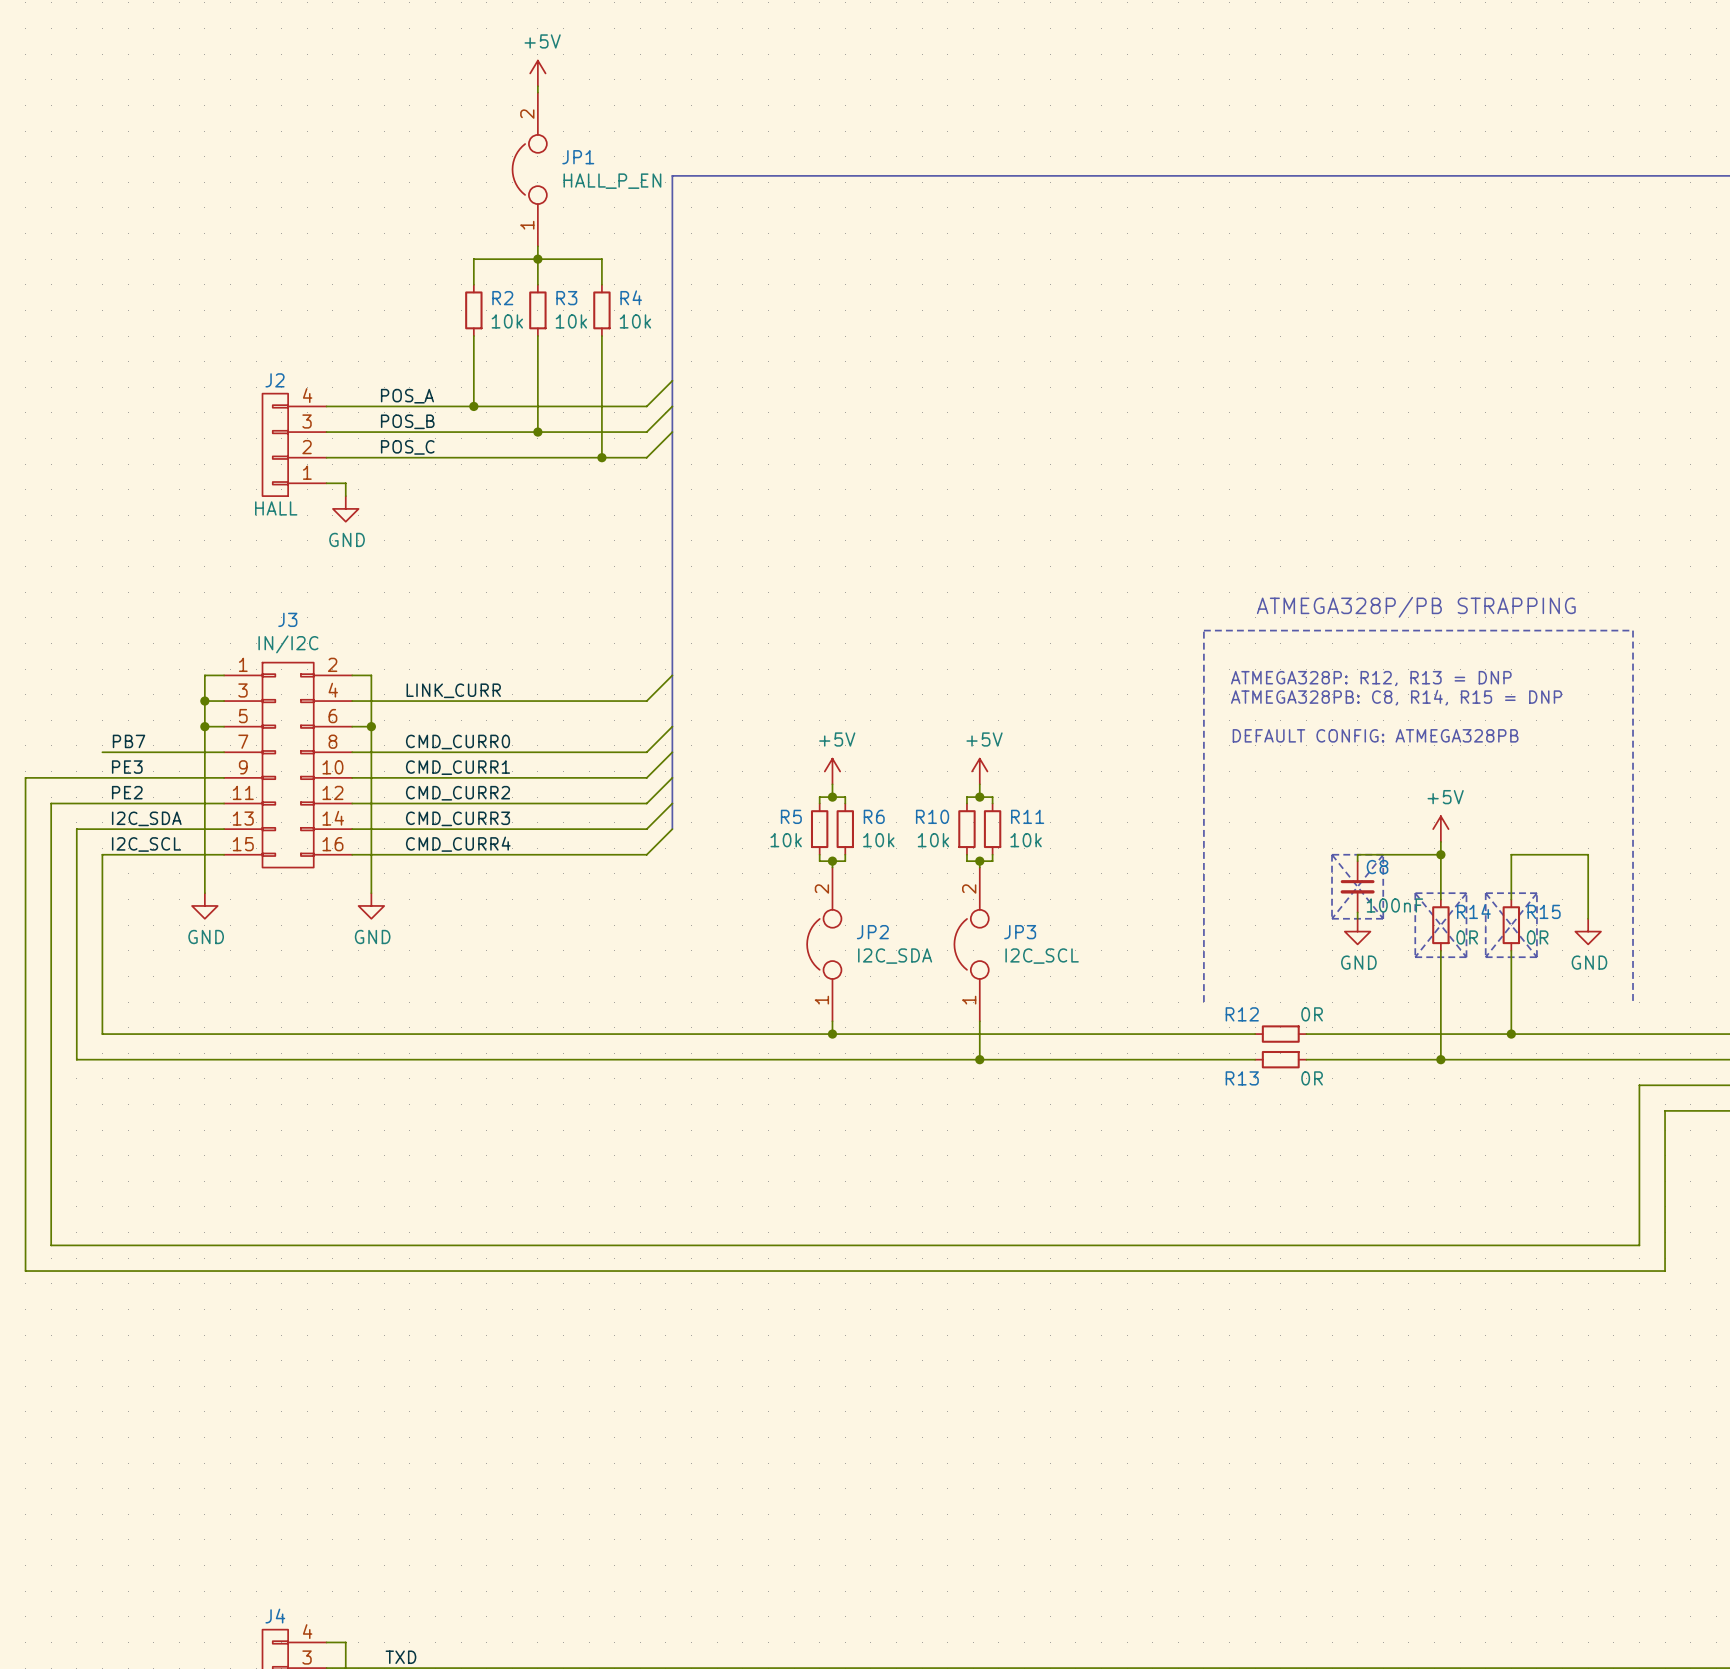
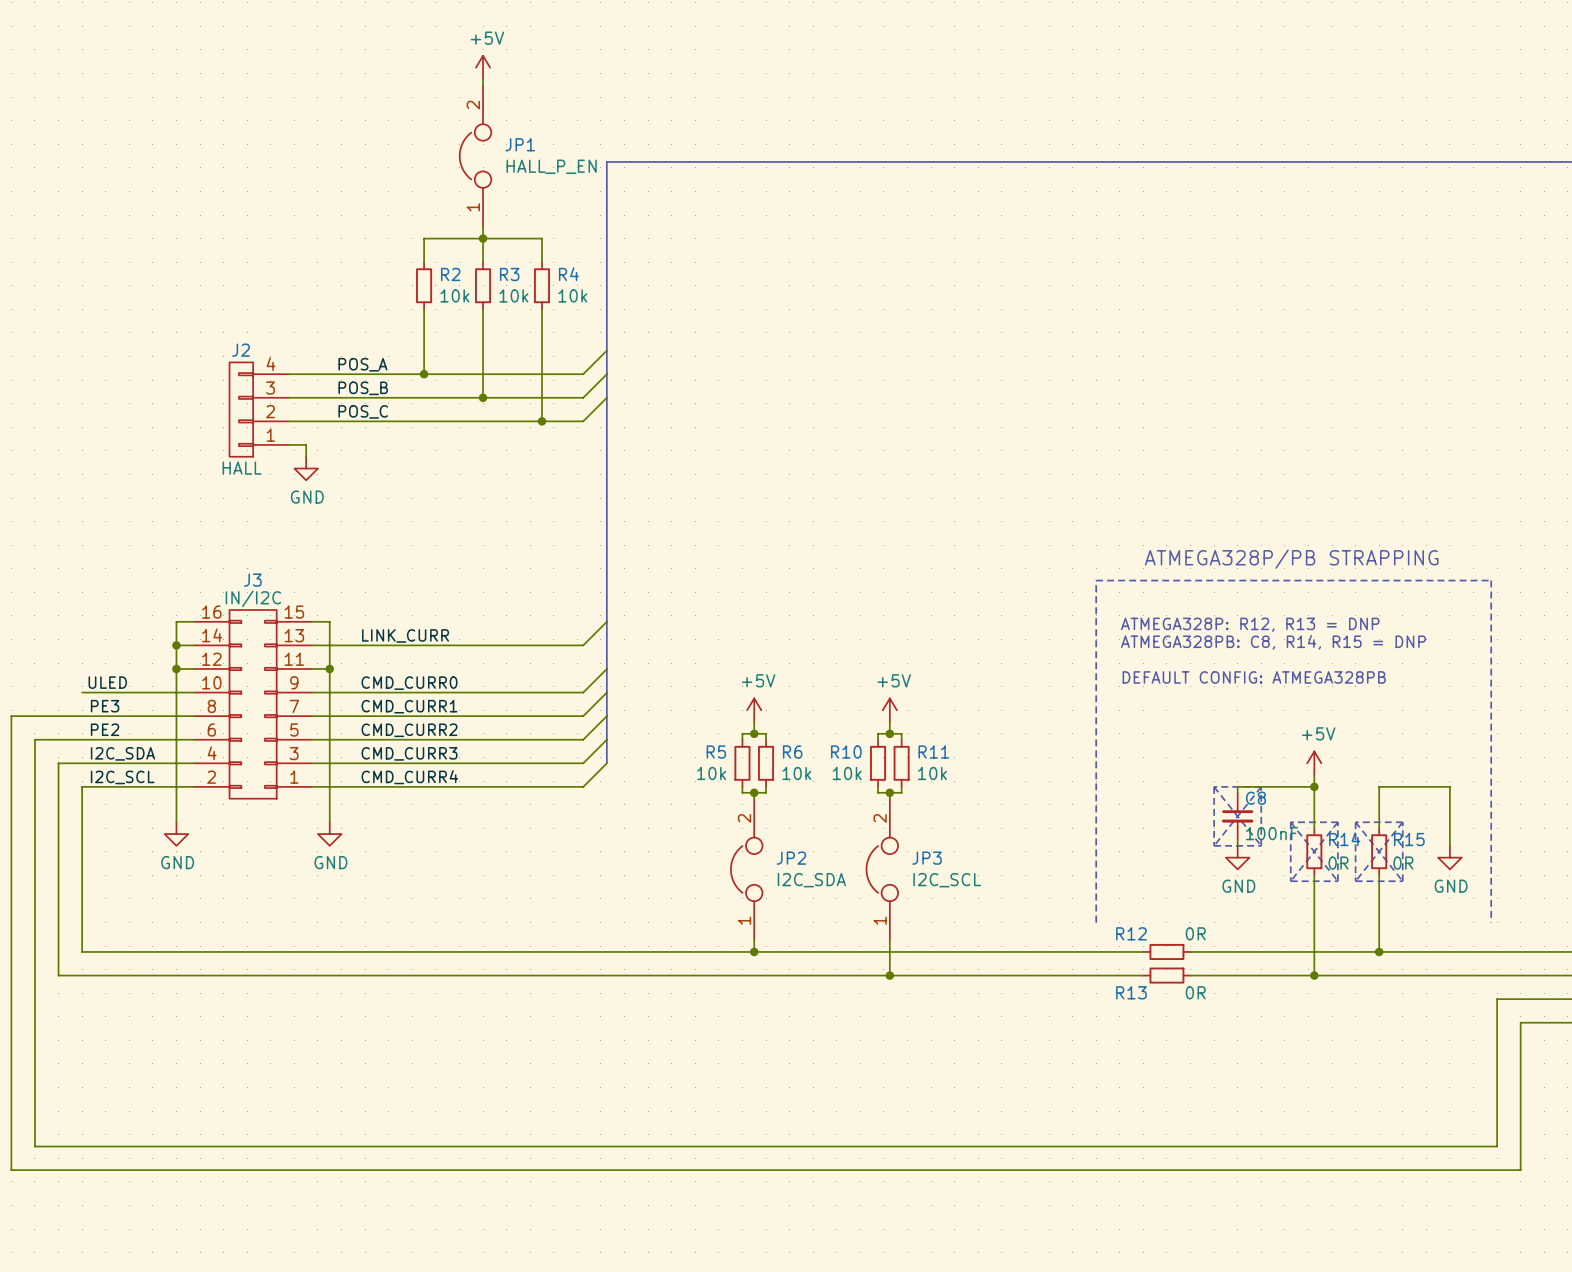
label: PB7 (129, 741) -> ULED (107, 682)
J3 rotation: 0° (288, 765) -> 180° (253, 704)

